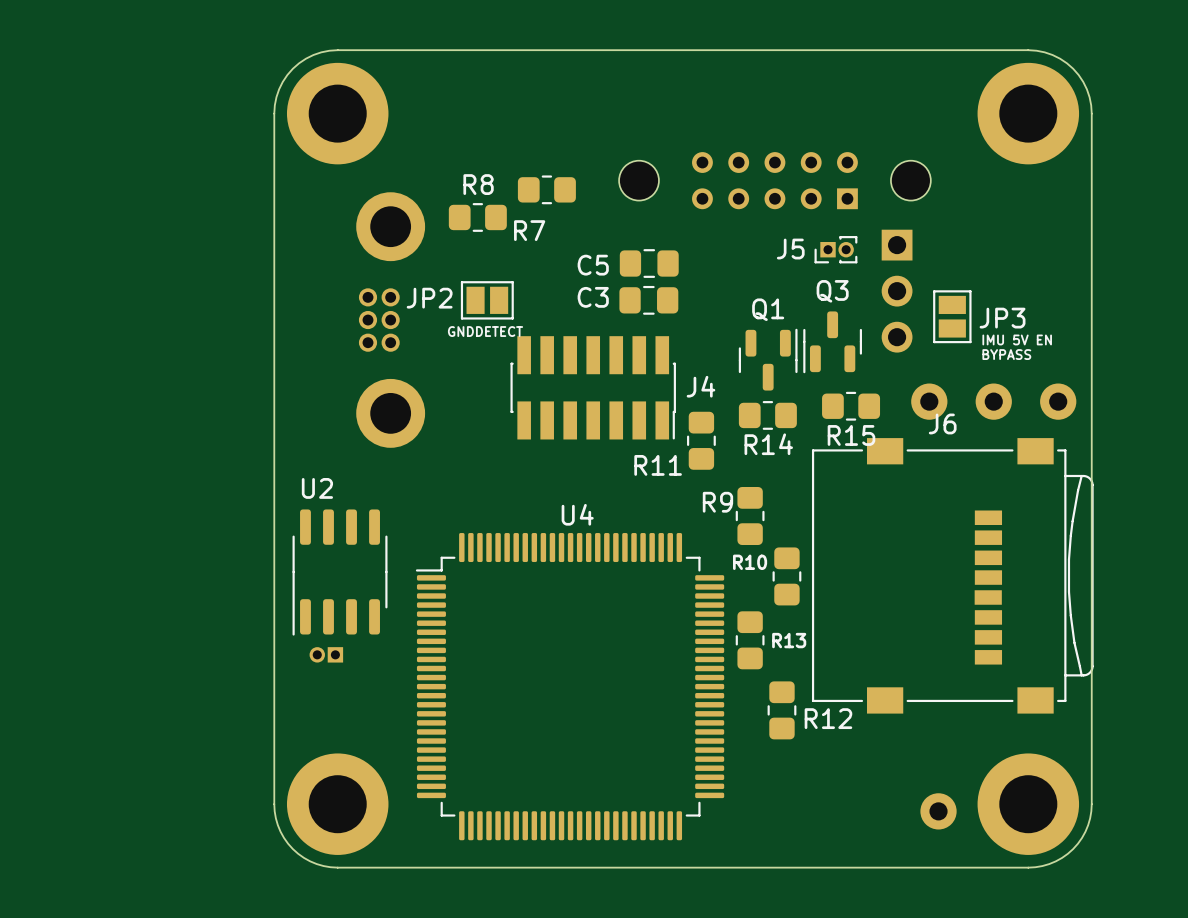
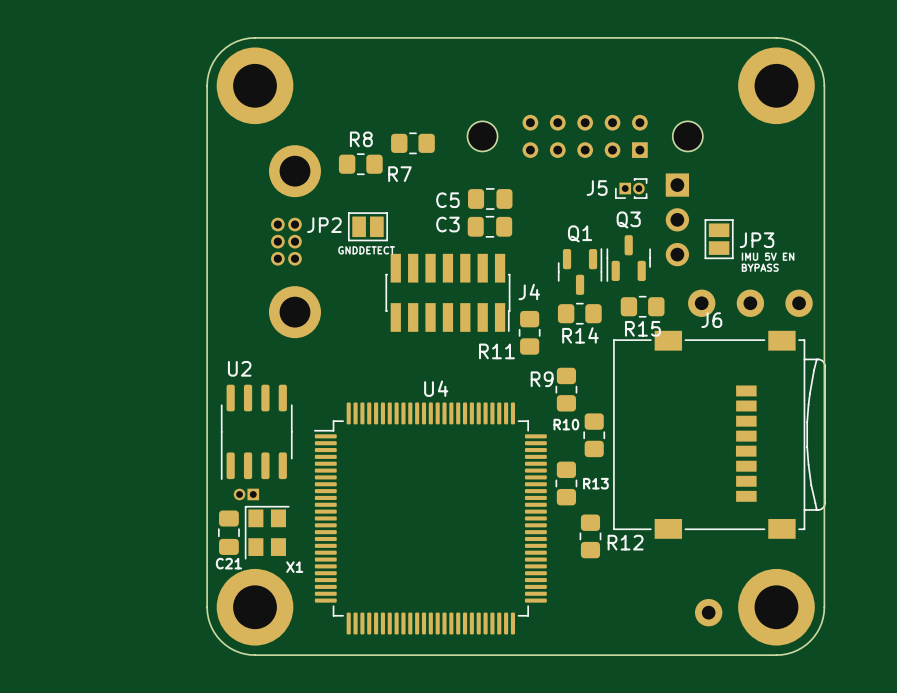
C21: none -> (228, 532)
X1: none -> (267, 532)

